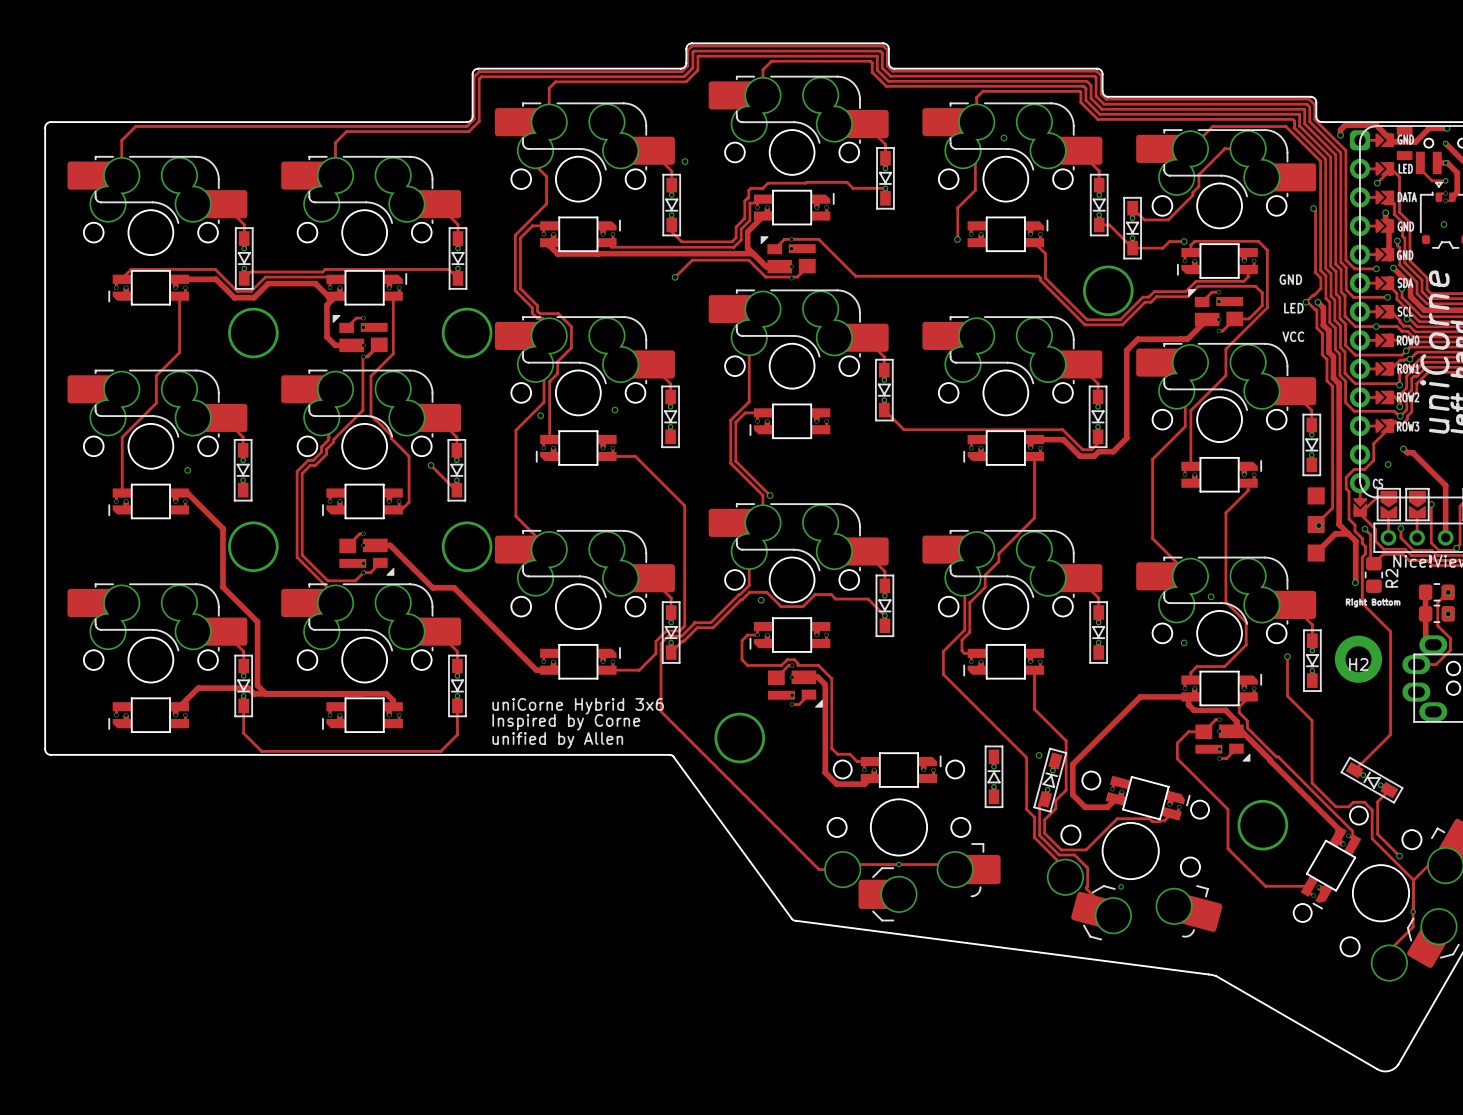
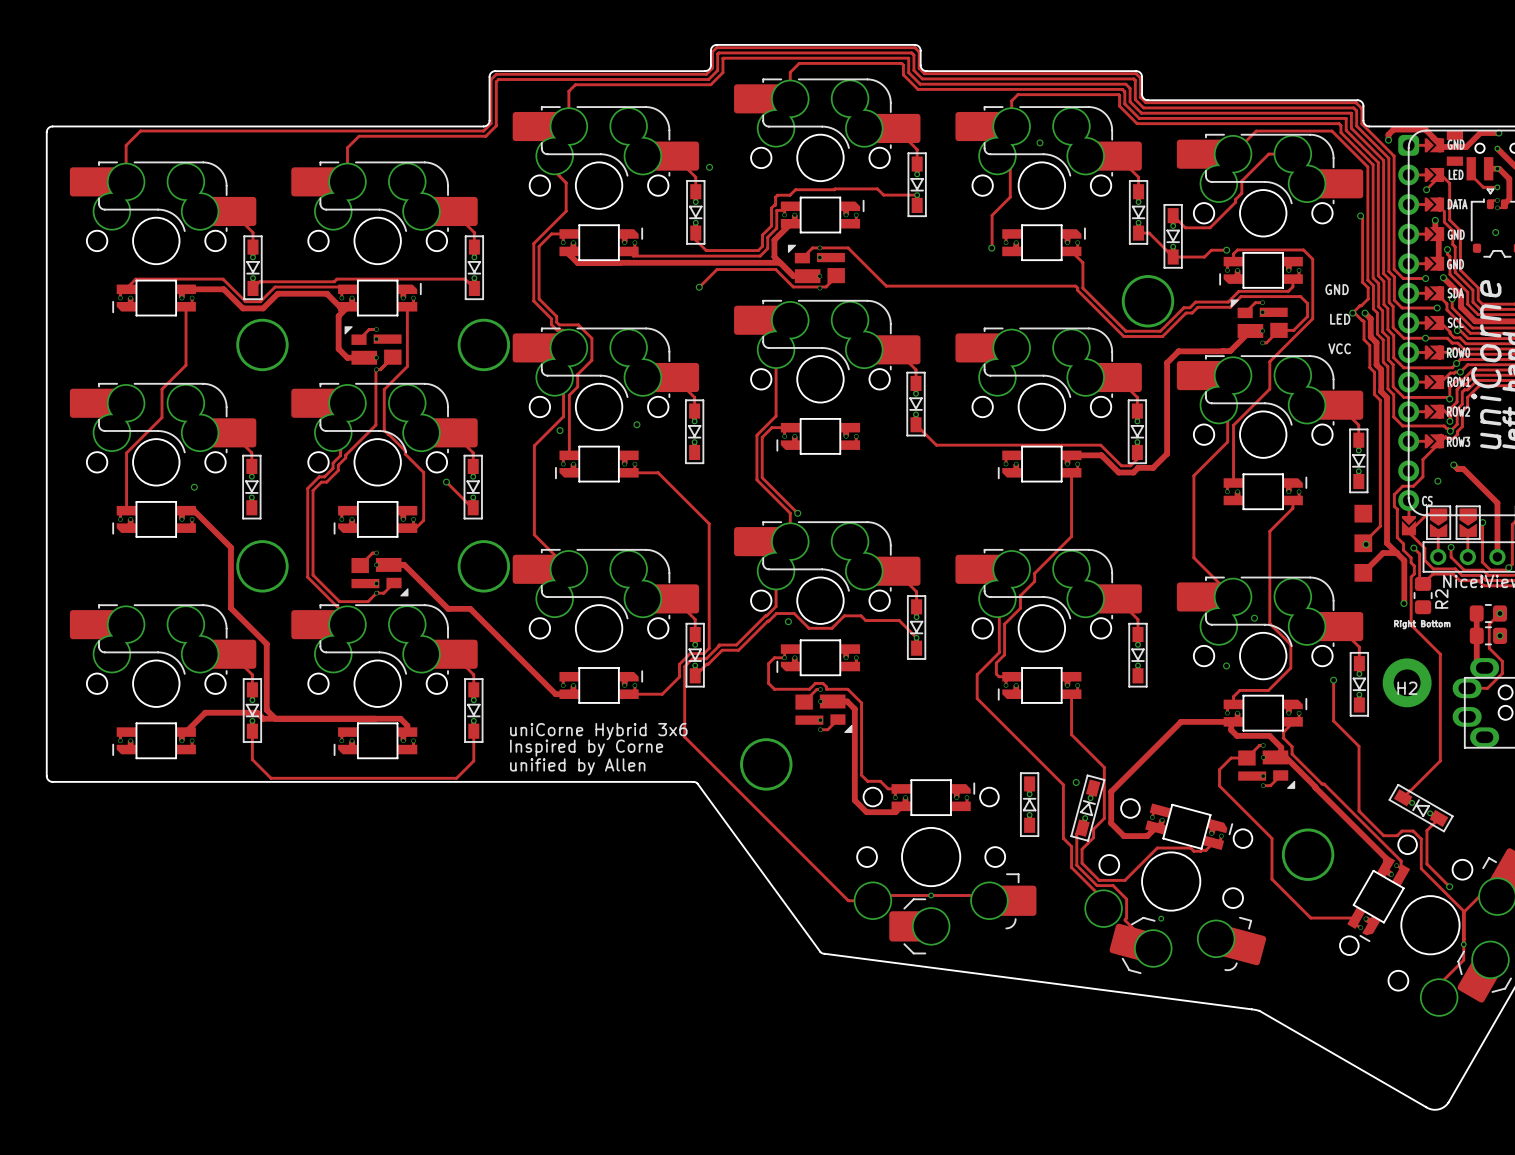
track: (1384, 203) (1394, 203) -> none

